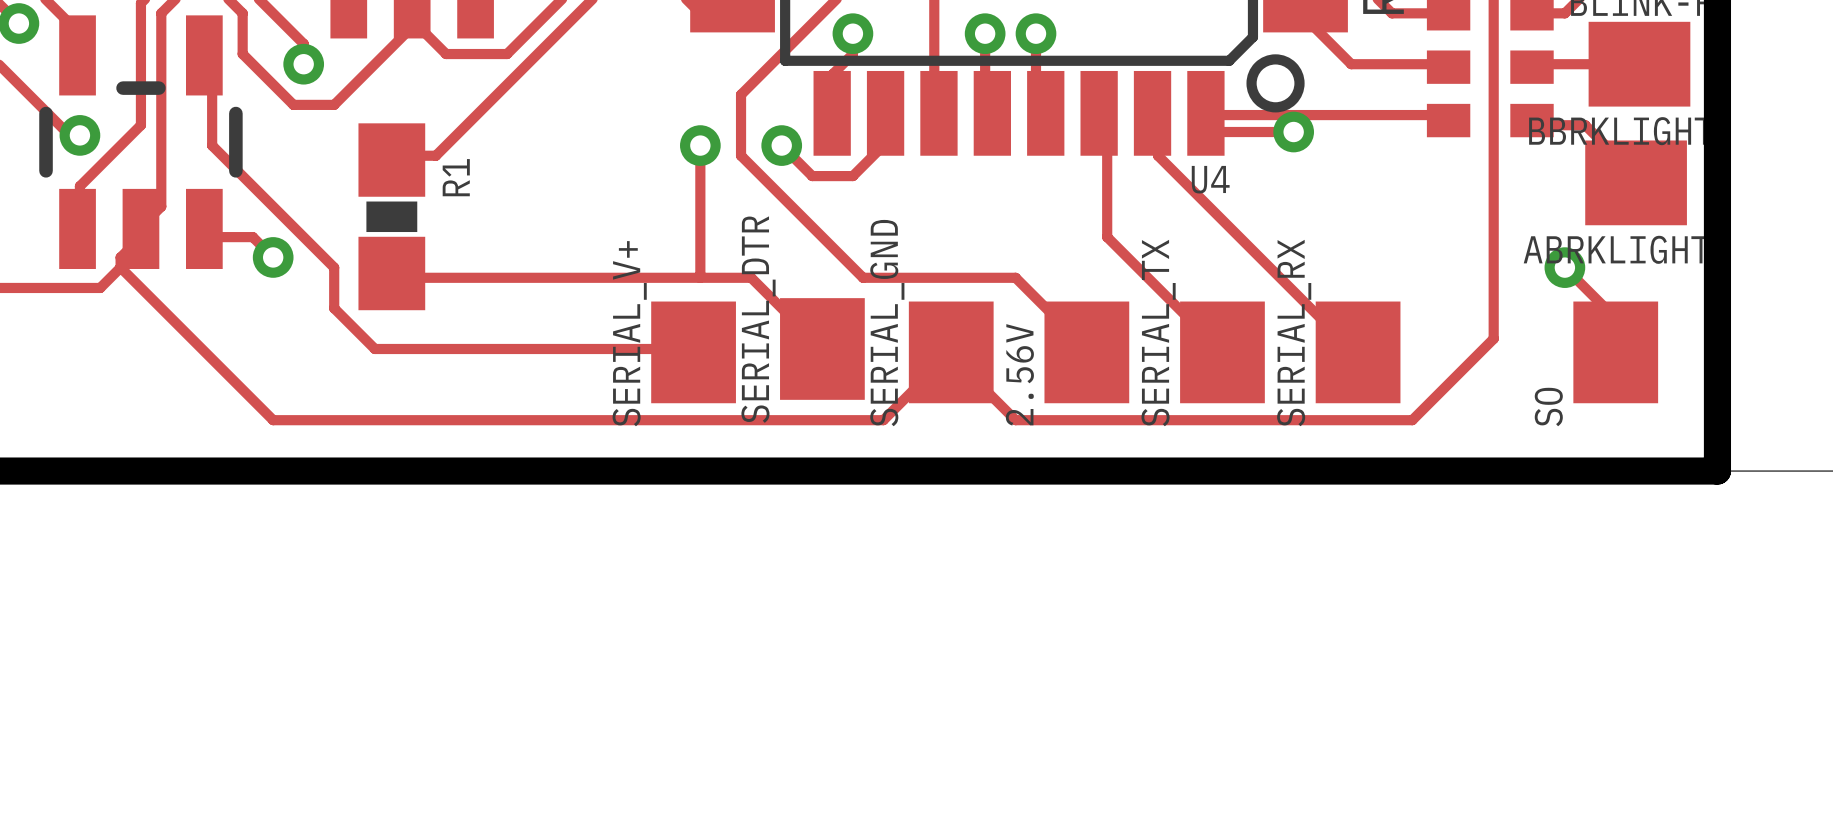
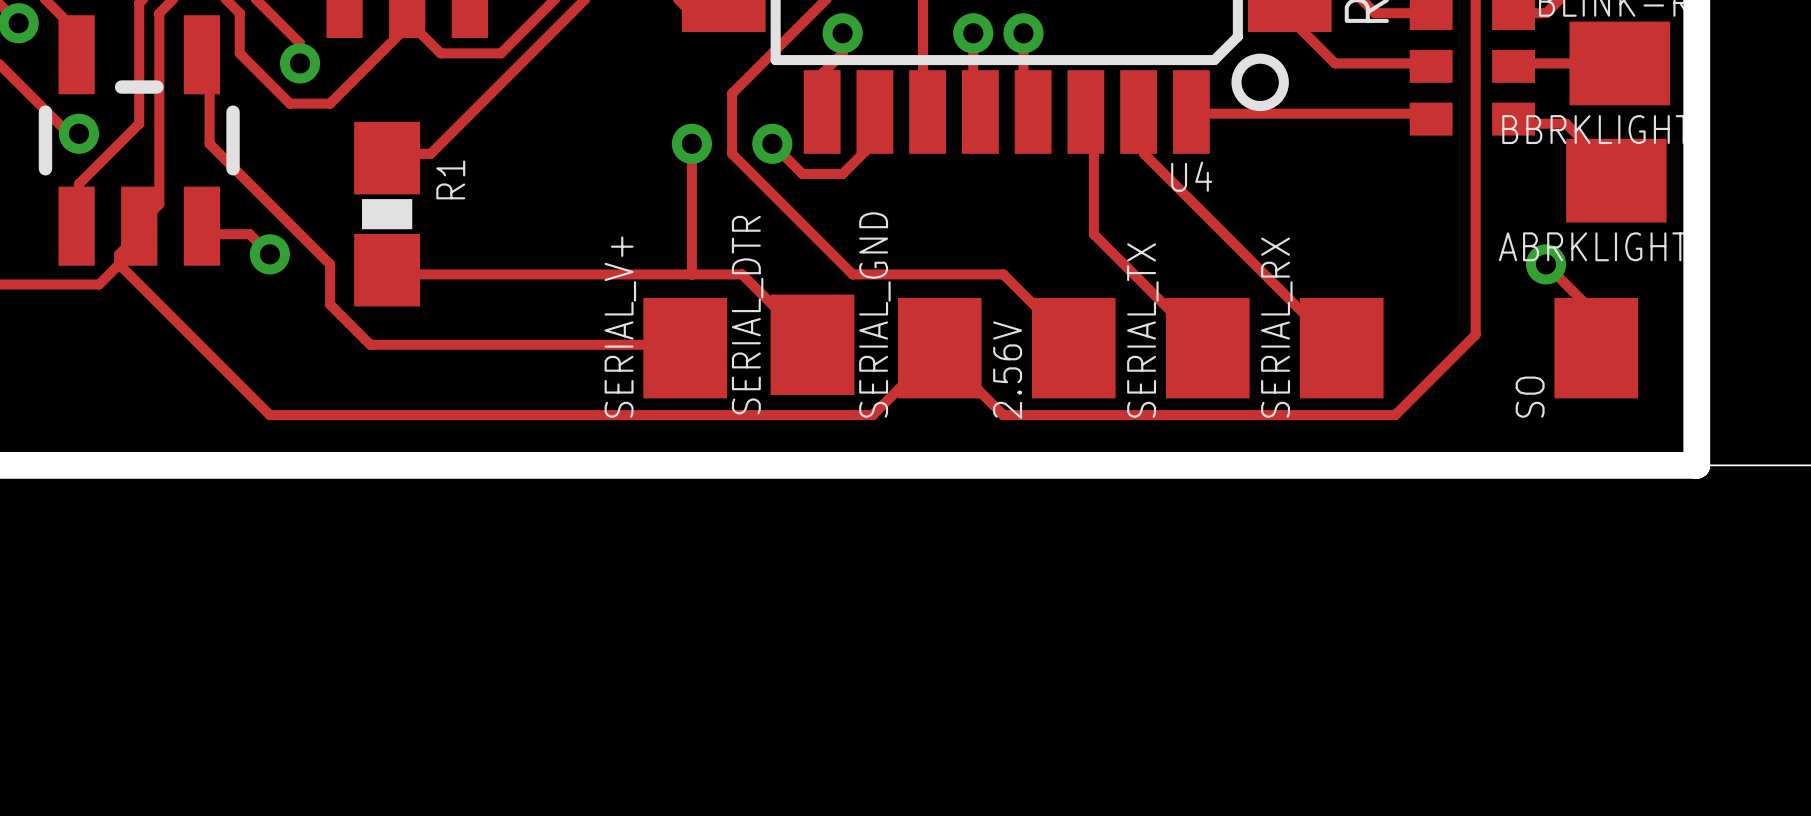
track: (1205, 113) (1208, 132) (1293, 132) -> none
via: (1293, 132) -> none

